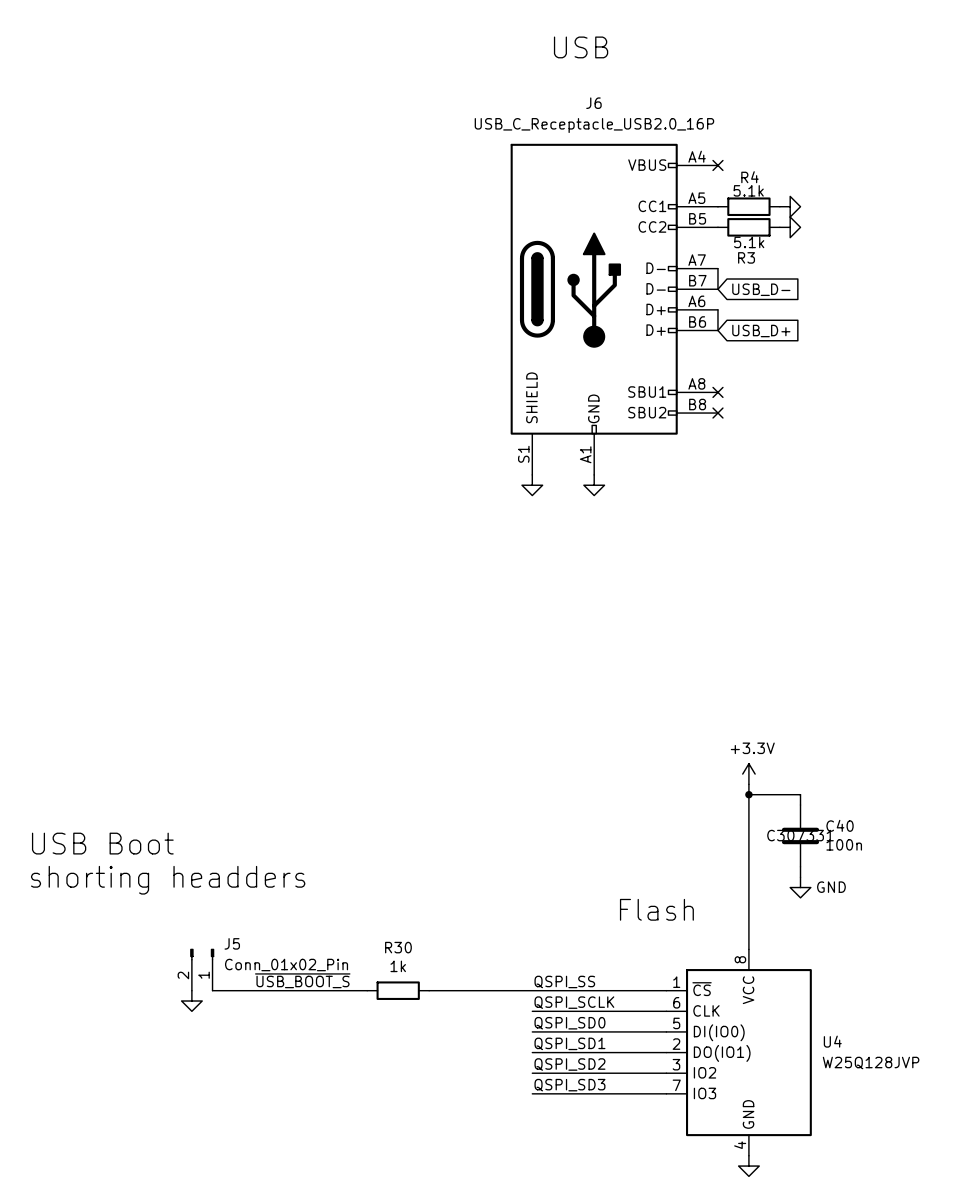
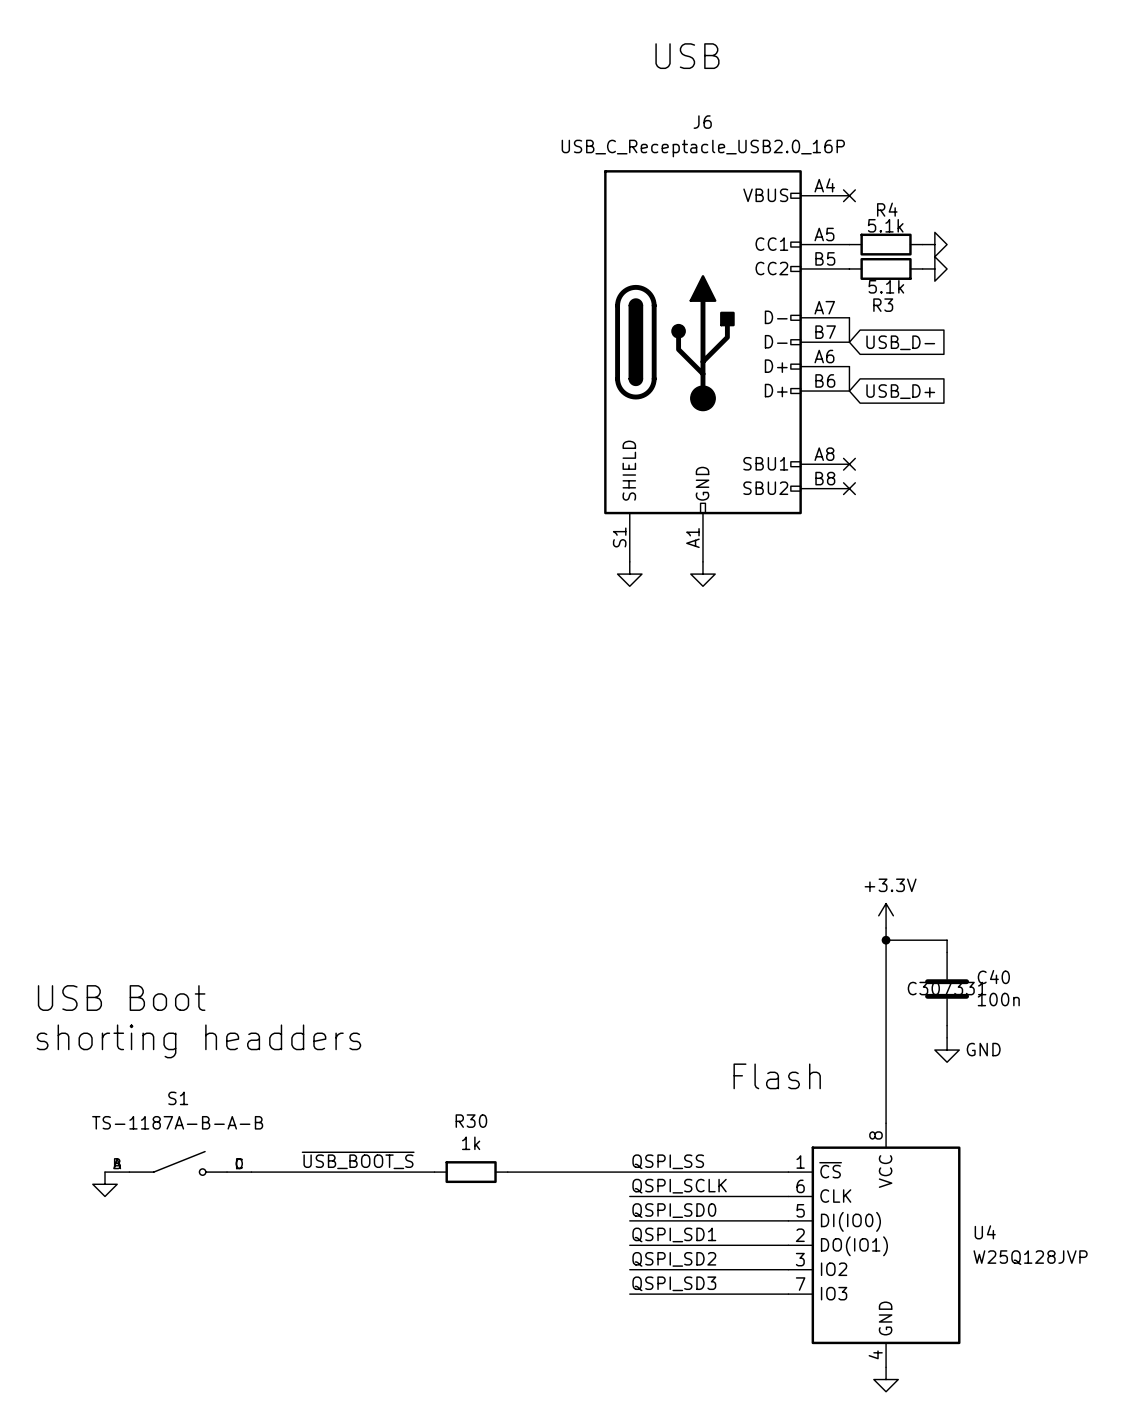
J5: Conn_01x02_Pin (202, 969) -> none
S1: none -> TS-1187A-B-A-B (178, 1163)
power symbol position: (191, 1001) -> (104, 1184)

